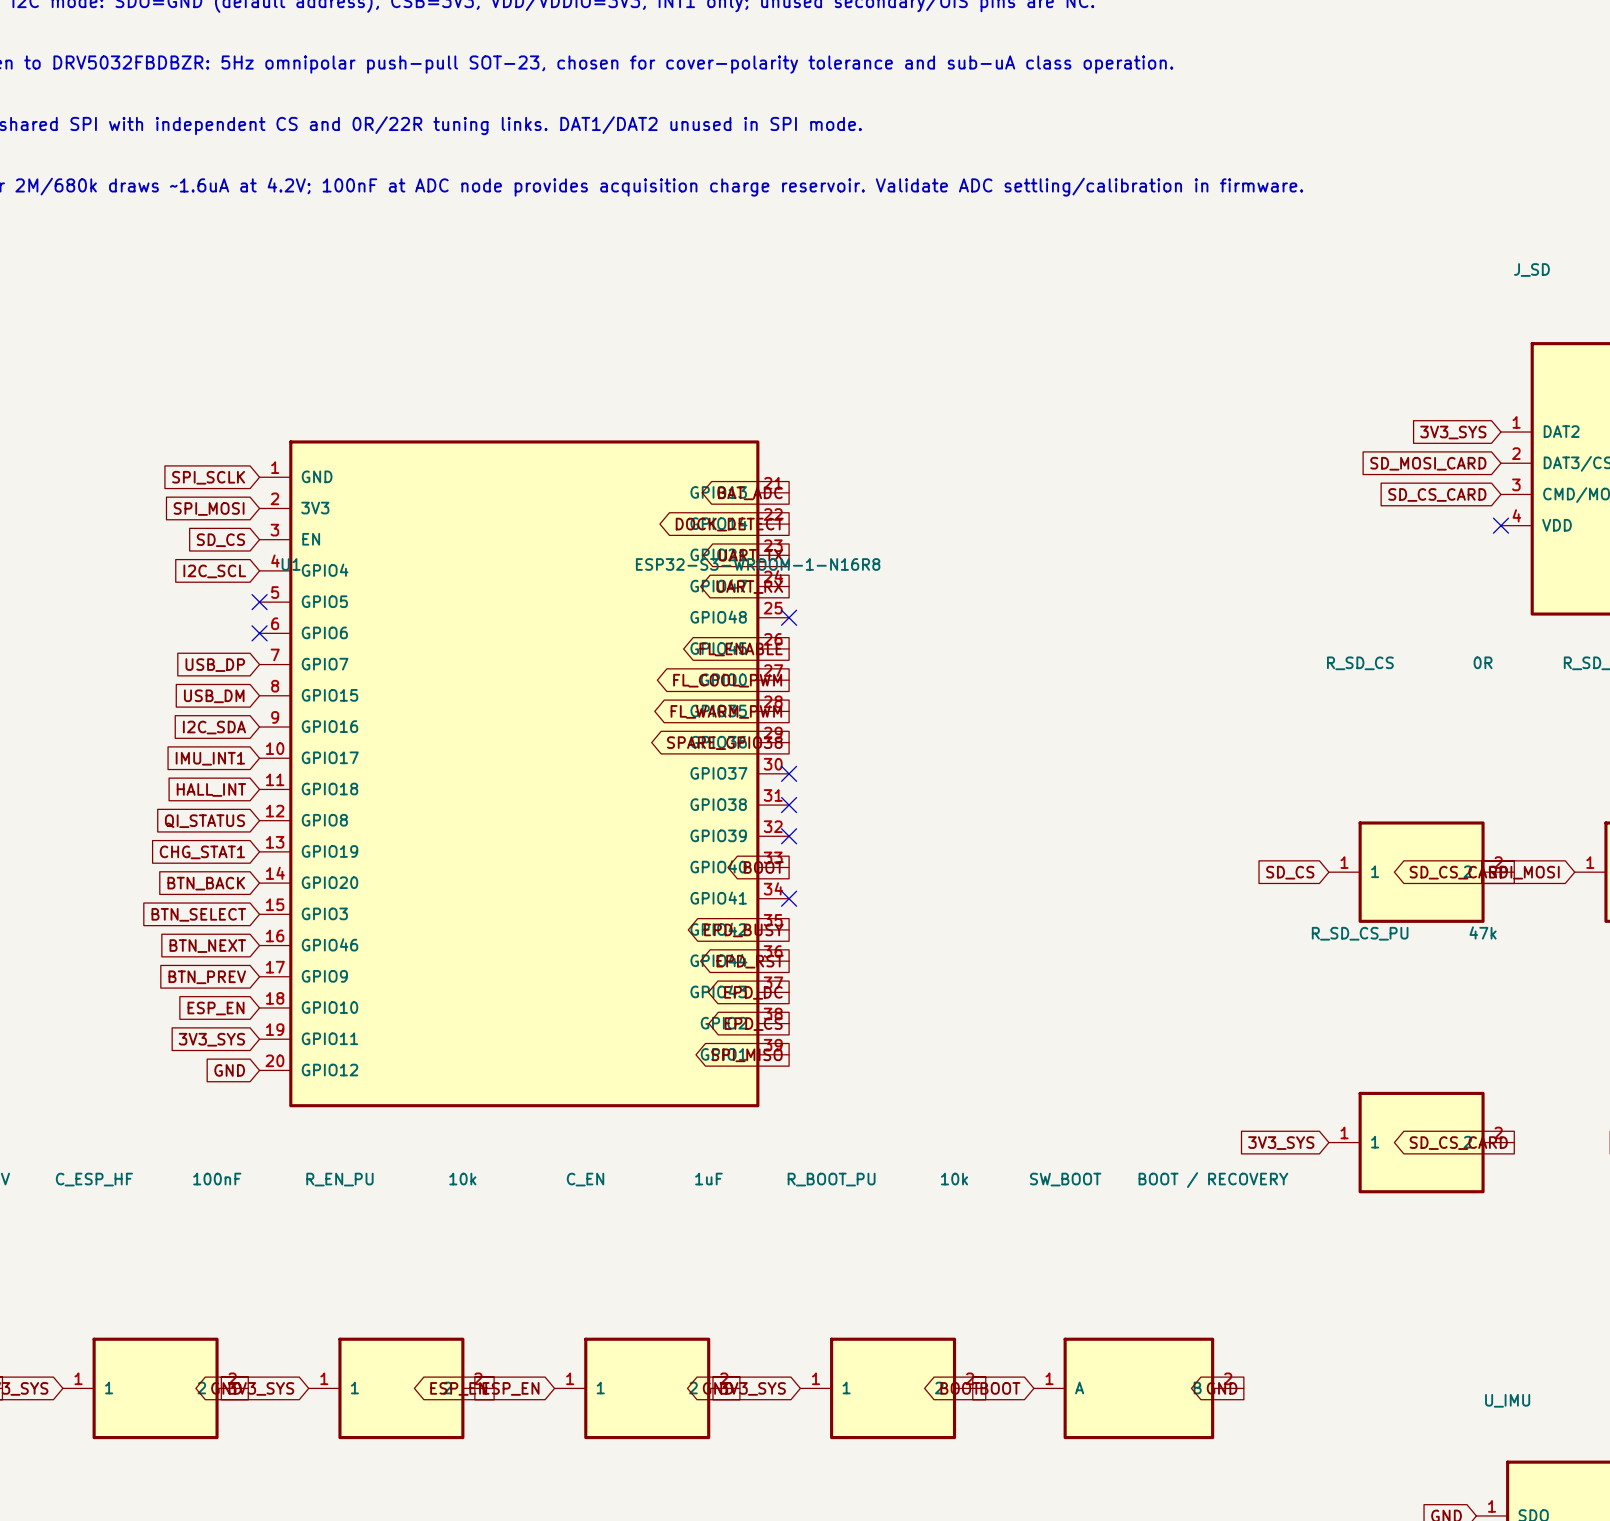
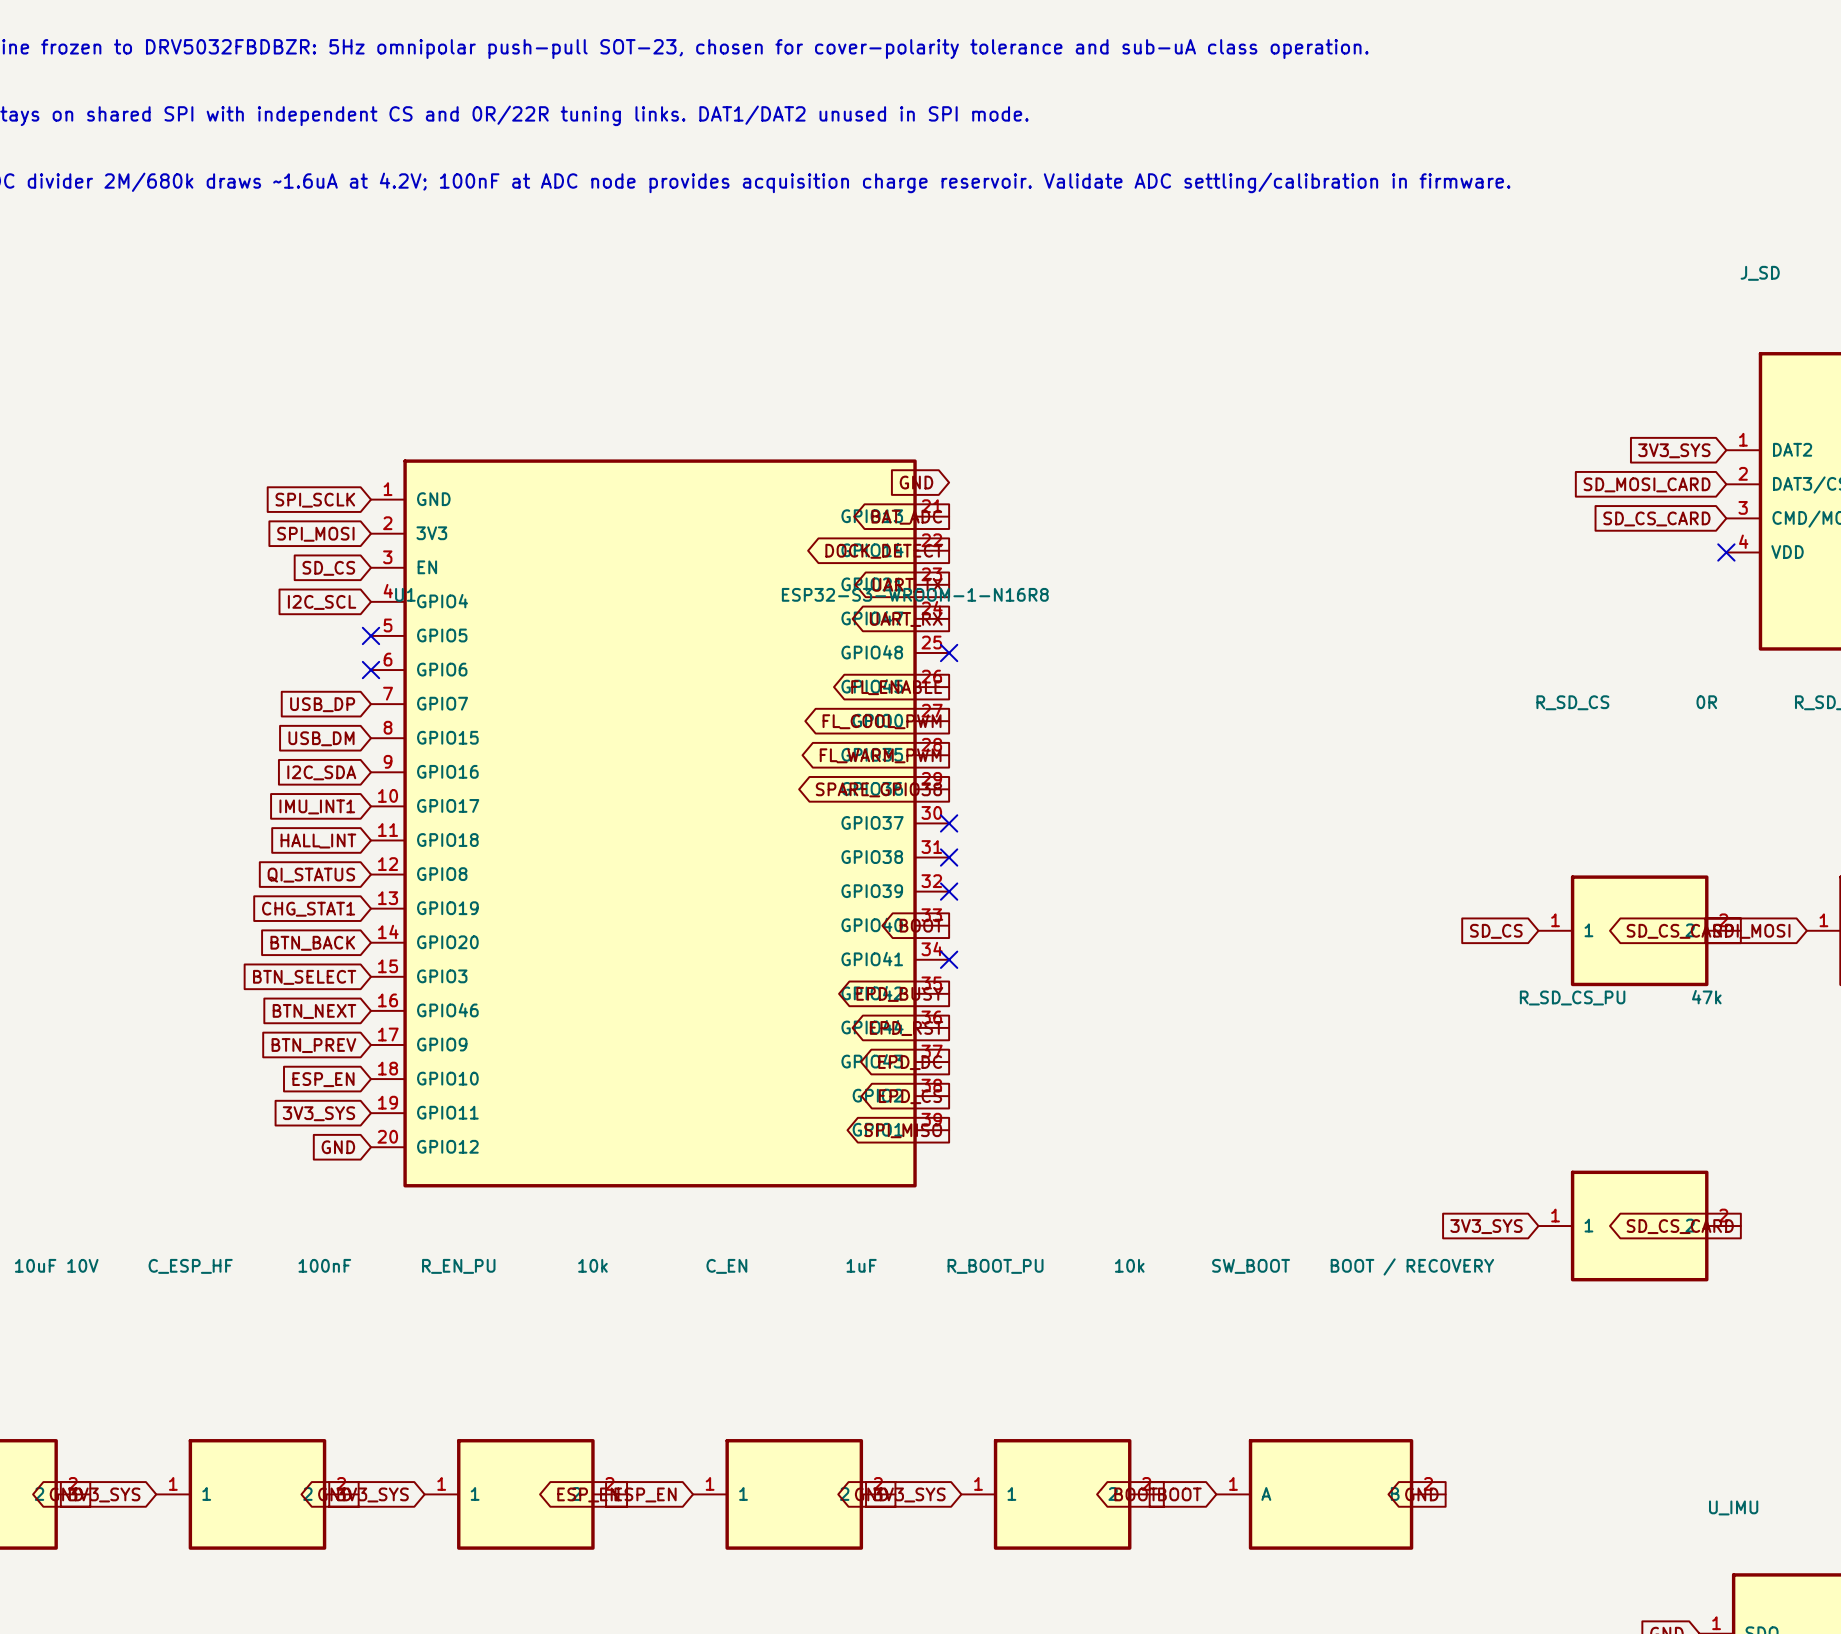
global label: none -> GND (916, 482)

